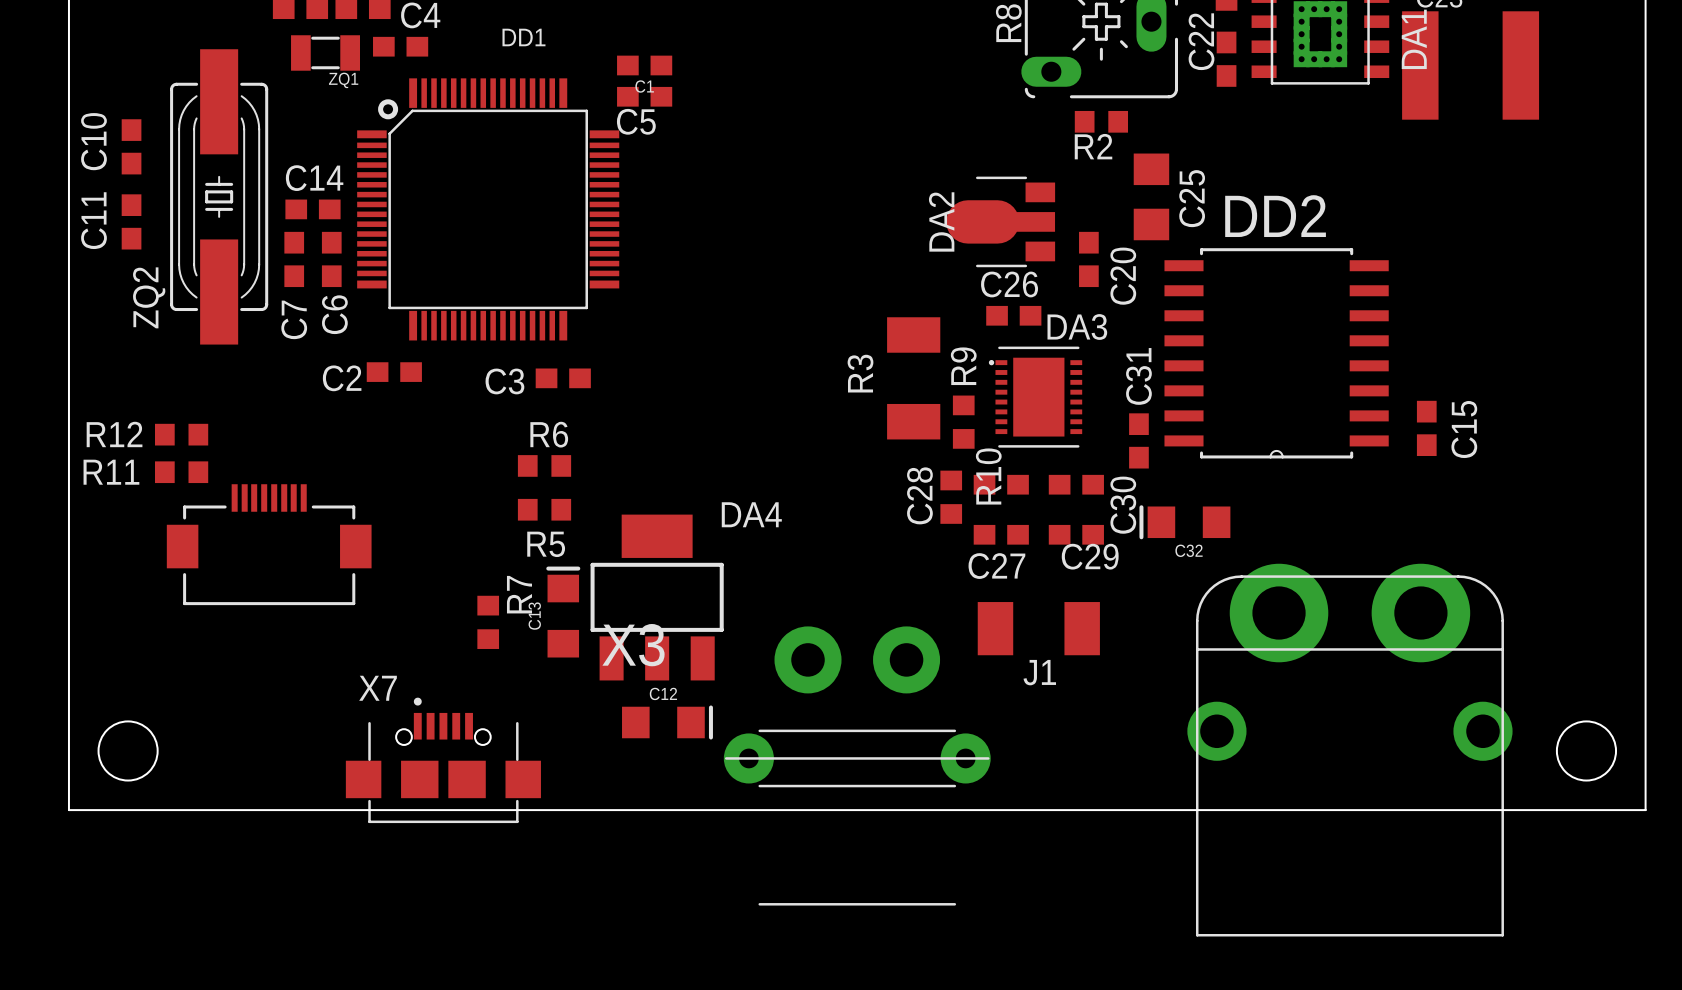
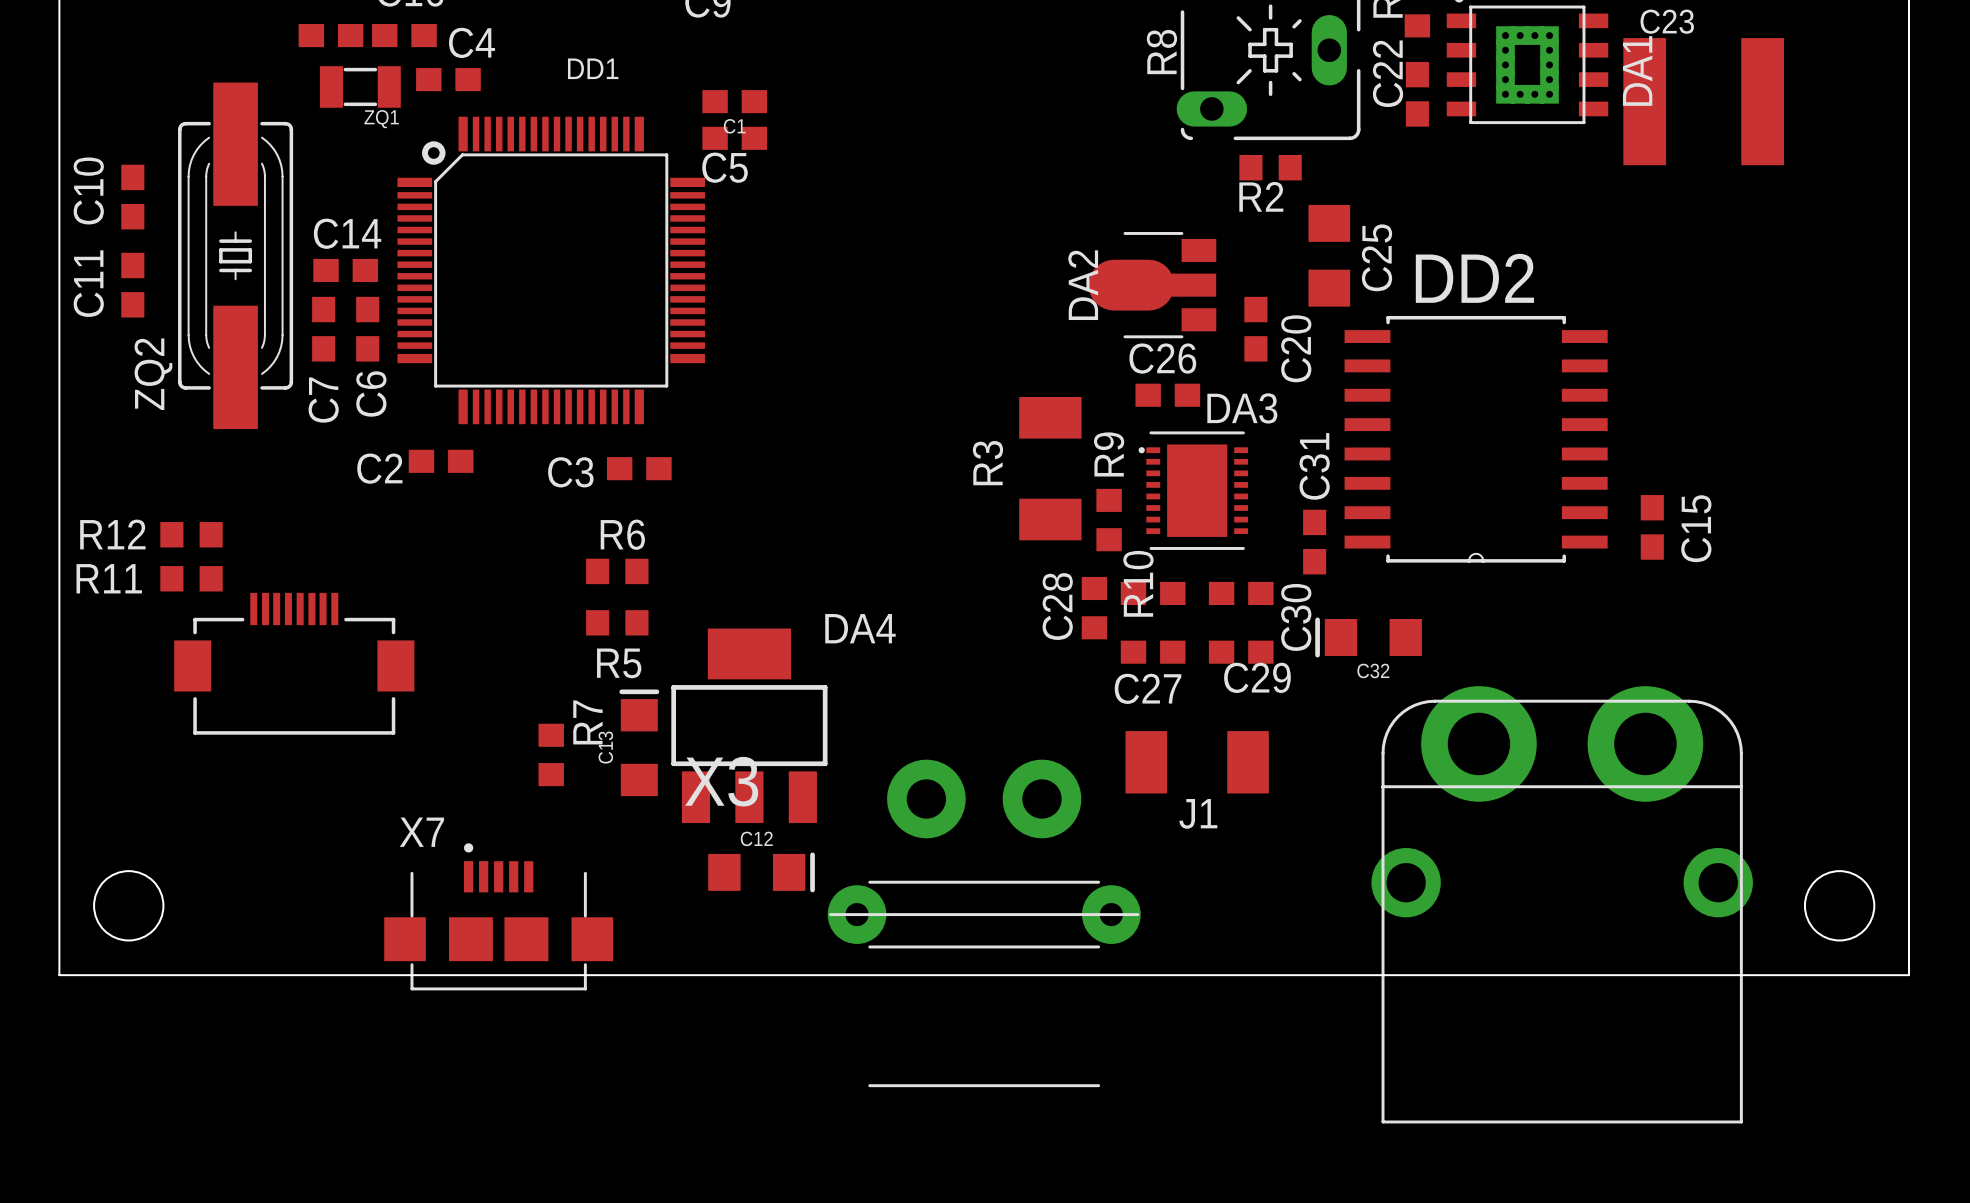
X7 footprint: [345, 697, 541, 824] -> [384, 843, 614, 991]

